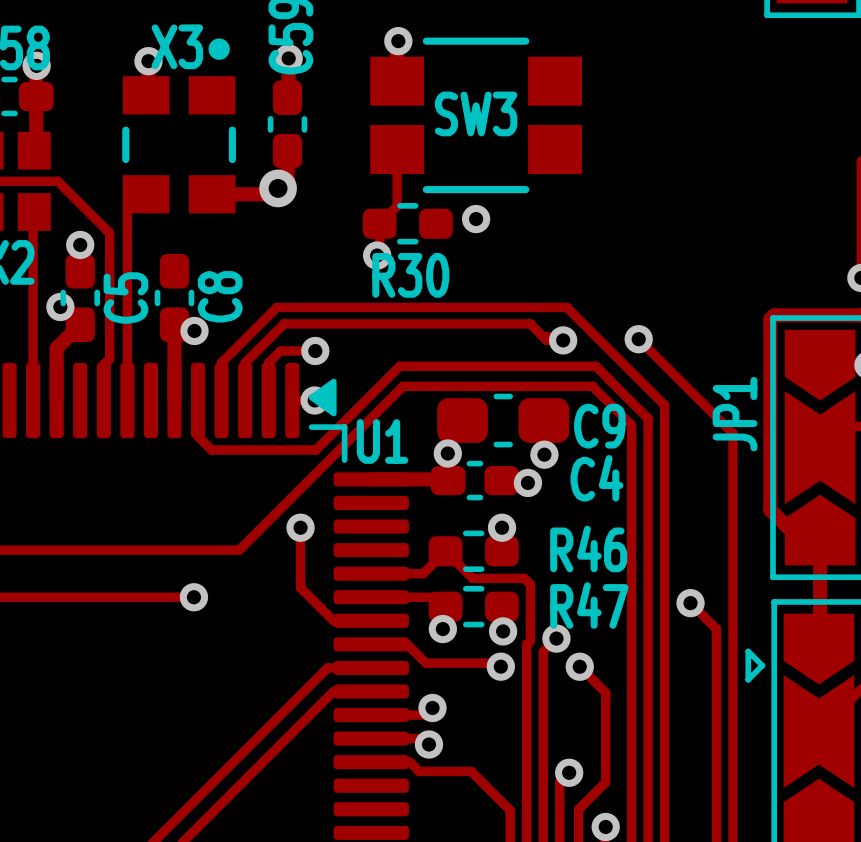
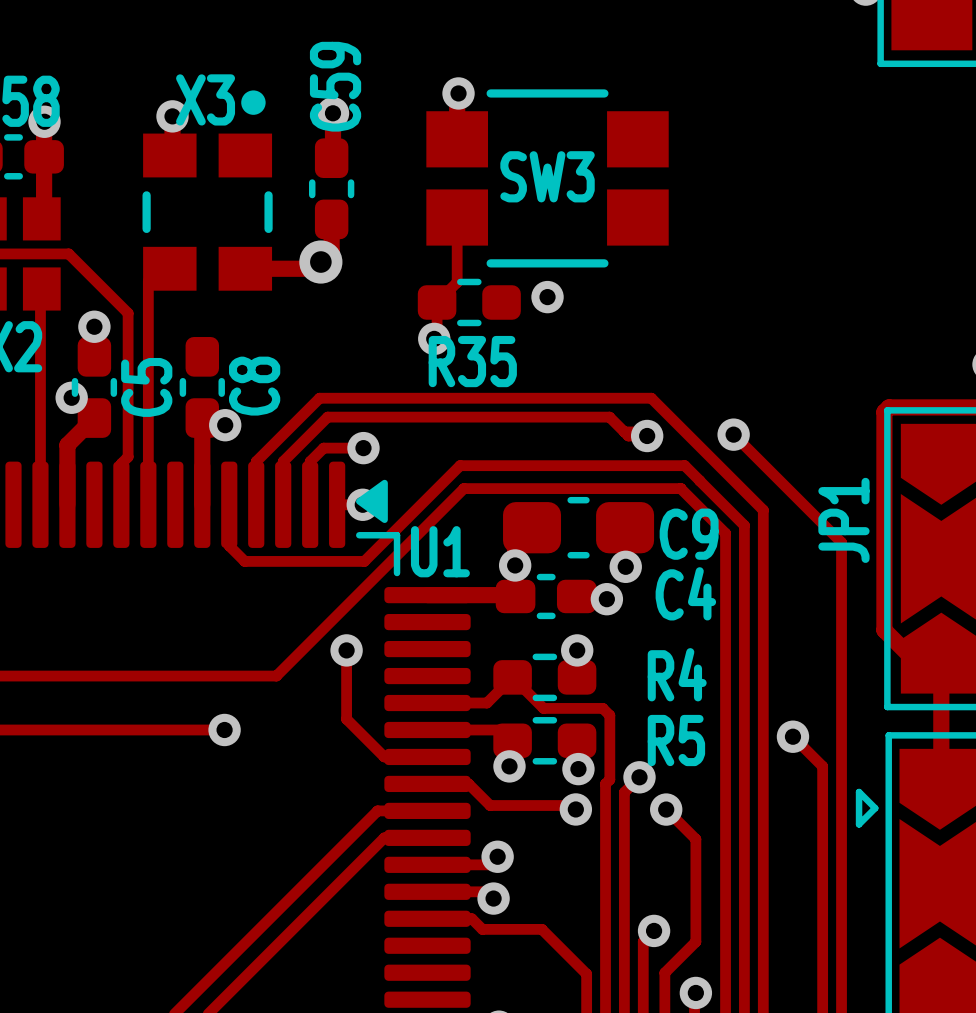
R30 name: R30 (410, 275) -> R35 (472, 361)
R46 name: R46 (588, 548) -> R4 (677, 674)
R47 name: R47 (589, 605) -> R5 (676, 740)

